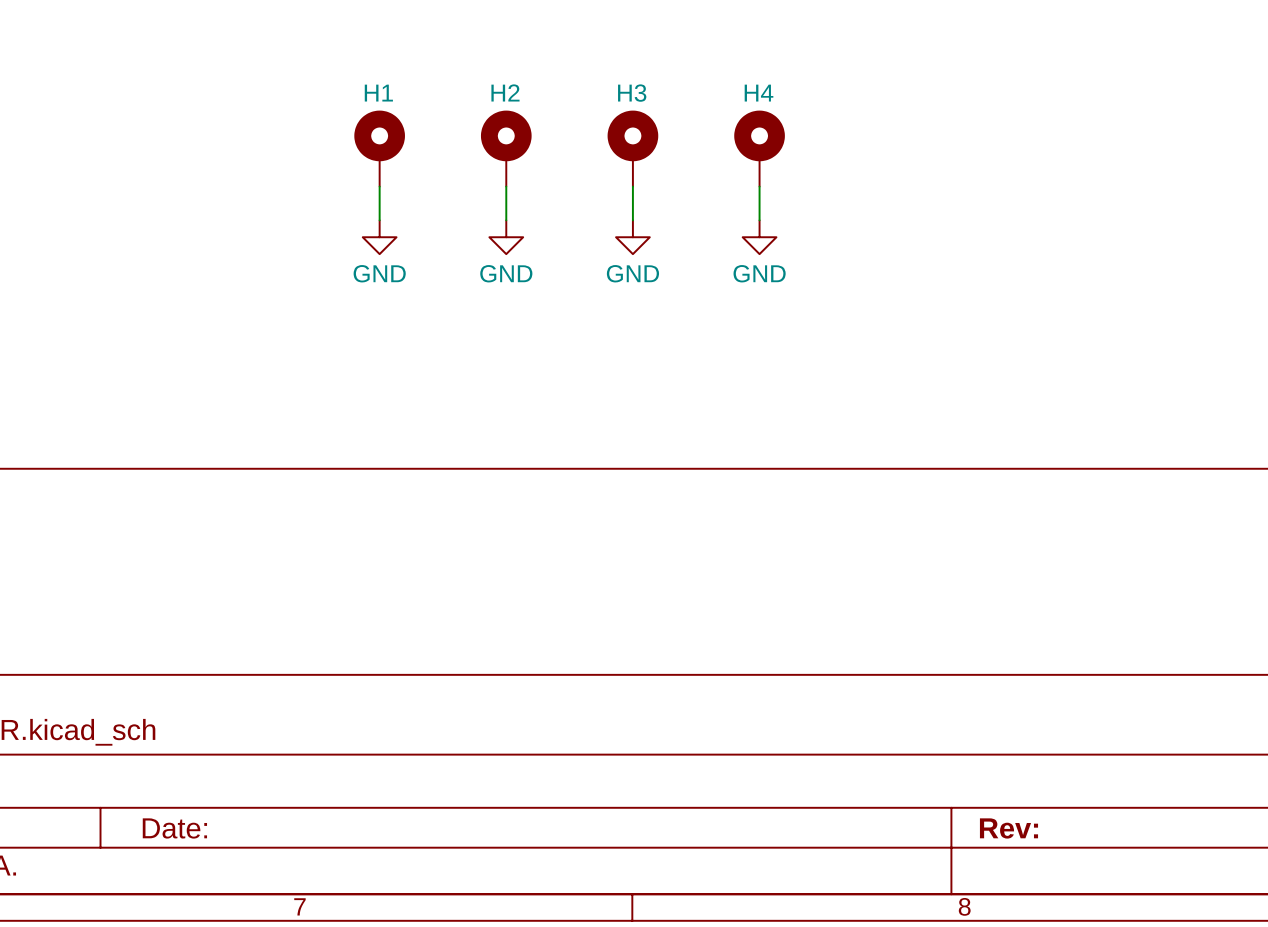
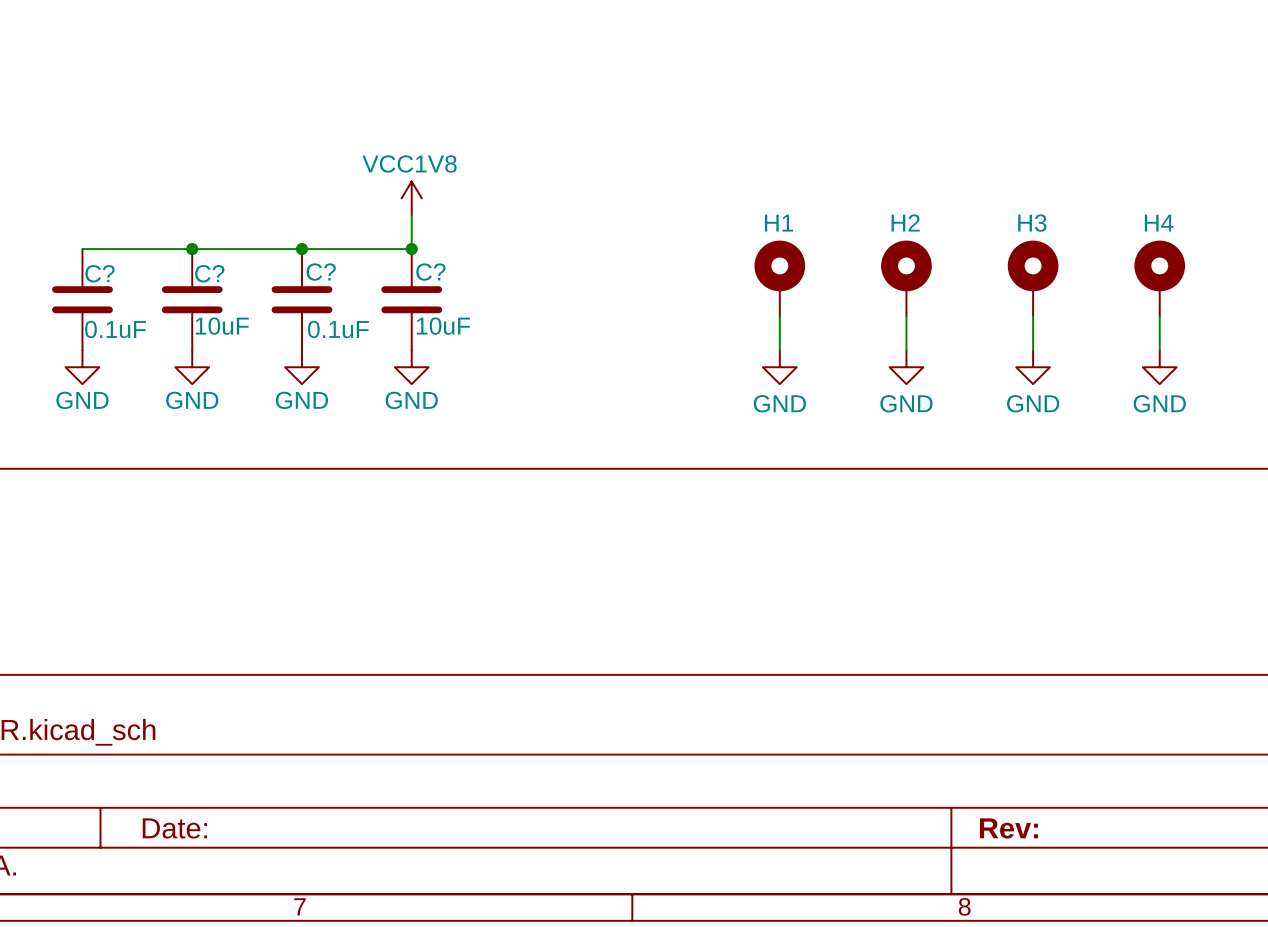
H1 position: (379, 148) -> (779, 278)
H2 position: (506, 148) -> (906, 278)
H3 position: (632, 148) -> (1033, 278)
H4 position: (759, 148) -> (1159, 278)
wire: (379, 186) (379, 220) -> none
wire: (506, 186) (506, 220) -> (779, 316) (779, 350)
wire: (632, 186) (632, 220) -> (906, 316) (906, 350)
wire: (759, 186) (759, 220) -> (1033, 316) (1033, 350)
power symbol: none -> VCC1V8 (411, 198)
wire: none -> (411, 215) (411, 249) (82, 249)
power symbol: GND (379, 237) -> none
power symbol: GND (506, 237) -> none
power symbol: GND (632, 237) -> none
power symbol: GND (759, 237) -> none
junction: none -> (192, 249)
junction: none -> (301, 249)
junction: none -> (411, 249)
C?: none -> 0.1uF (82, 299)
C?: none -> 10uF (192, 299)
C?: none -> 0.1uF (301, 299)
C?: none -> 10uF (411, 299)
wire: none -> (1159, 316) (1159, 350)
power symbol: none -> GND (82, 367)
power symbol: none -> GND (192, 367)
power symbol: none -> GND (301, 367)
power symbol: none -> GND (411, 367)
power symbol: none -> GND (779, 367)
power symbol: none -> GND (906, 367)
power symbol: none -> GND (1033, 367)
power symbol: none -> GND (1159, 367)

